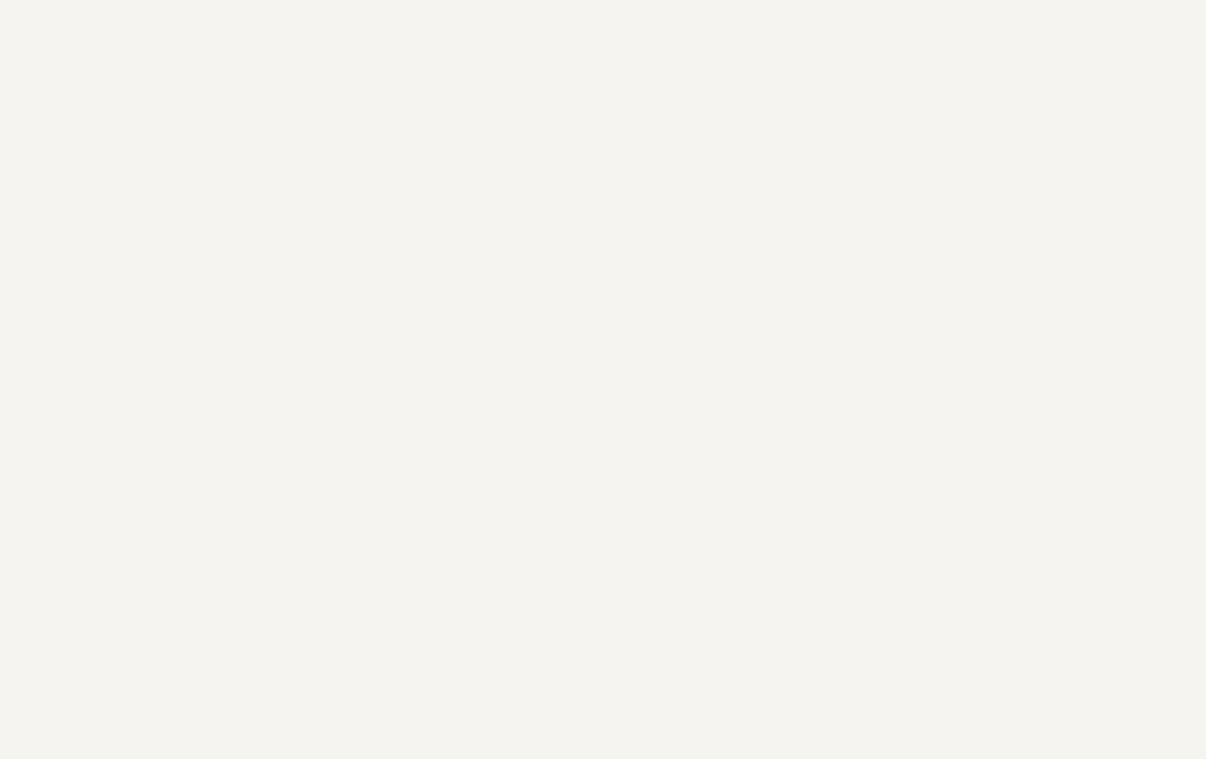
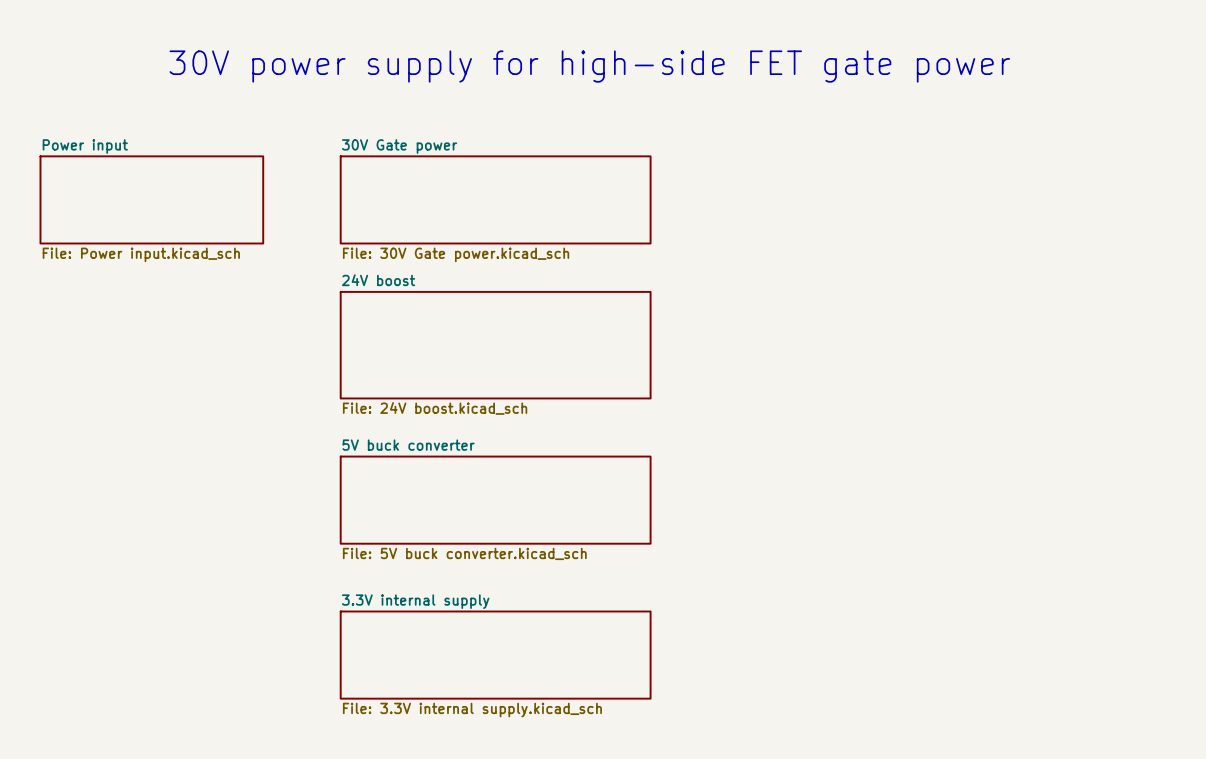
text: none -> 30V power supply for high-side FET gate power (589, 66)
sheet Power input: none -> File: Power input.kicad_sch (151, 199)
sheet 30V Gate power: none -> File: 30V Gate power.kicad_sch (495, 199)
sheet 24V boost: none -> File: 24V boost.kicad_sch (495, 345)
sheet 5V buck converter: none -> File: 5V buck converter.kicad_sch (495, 500)
sheet 3.3V internal supply: none -> File: 3.3V internal supply.kicad_sch (495, 655)

